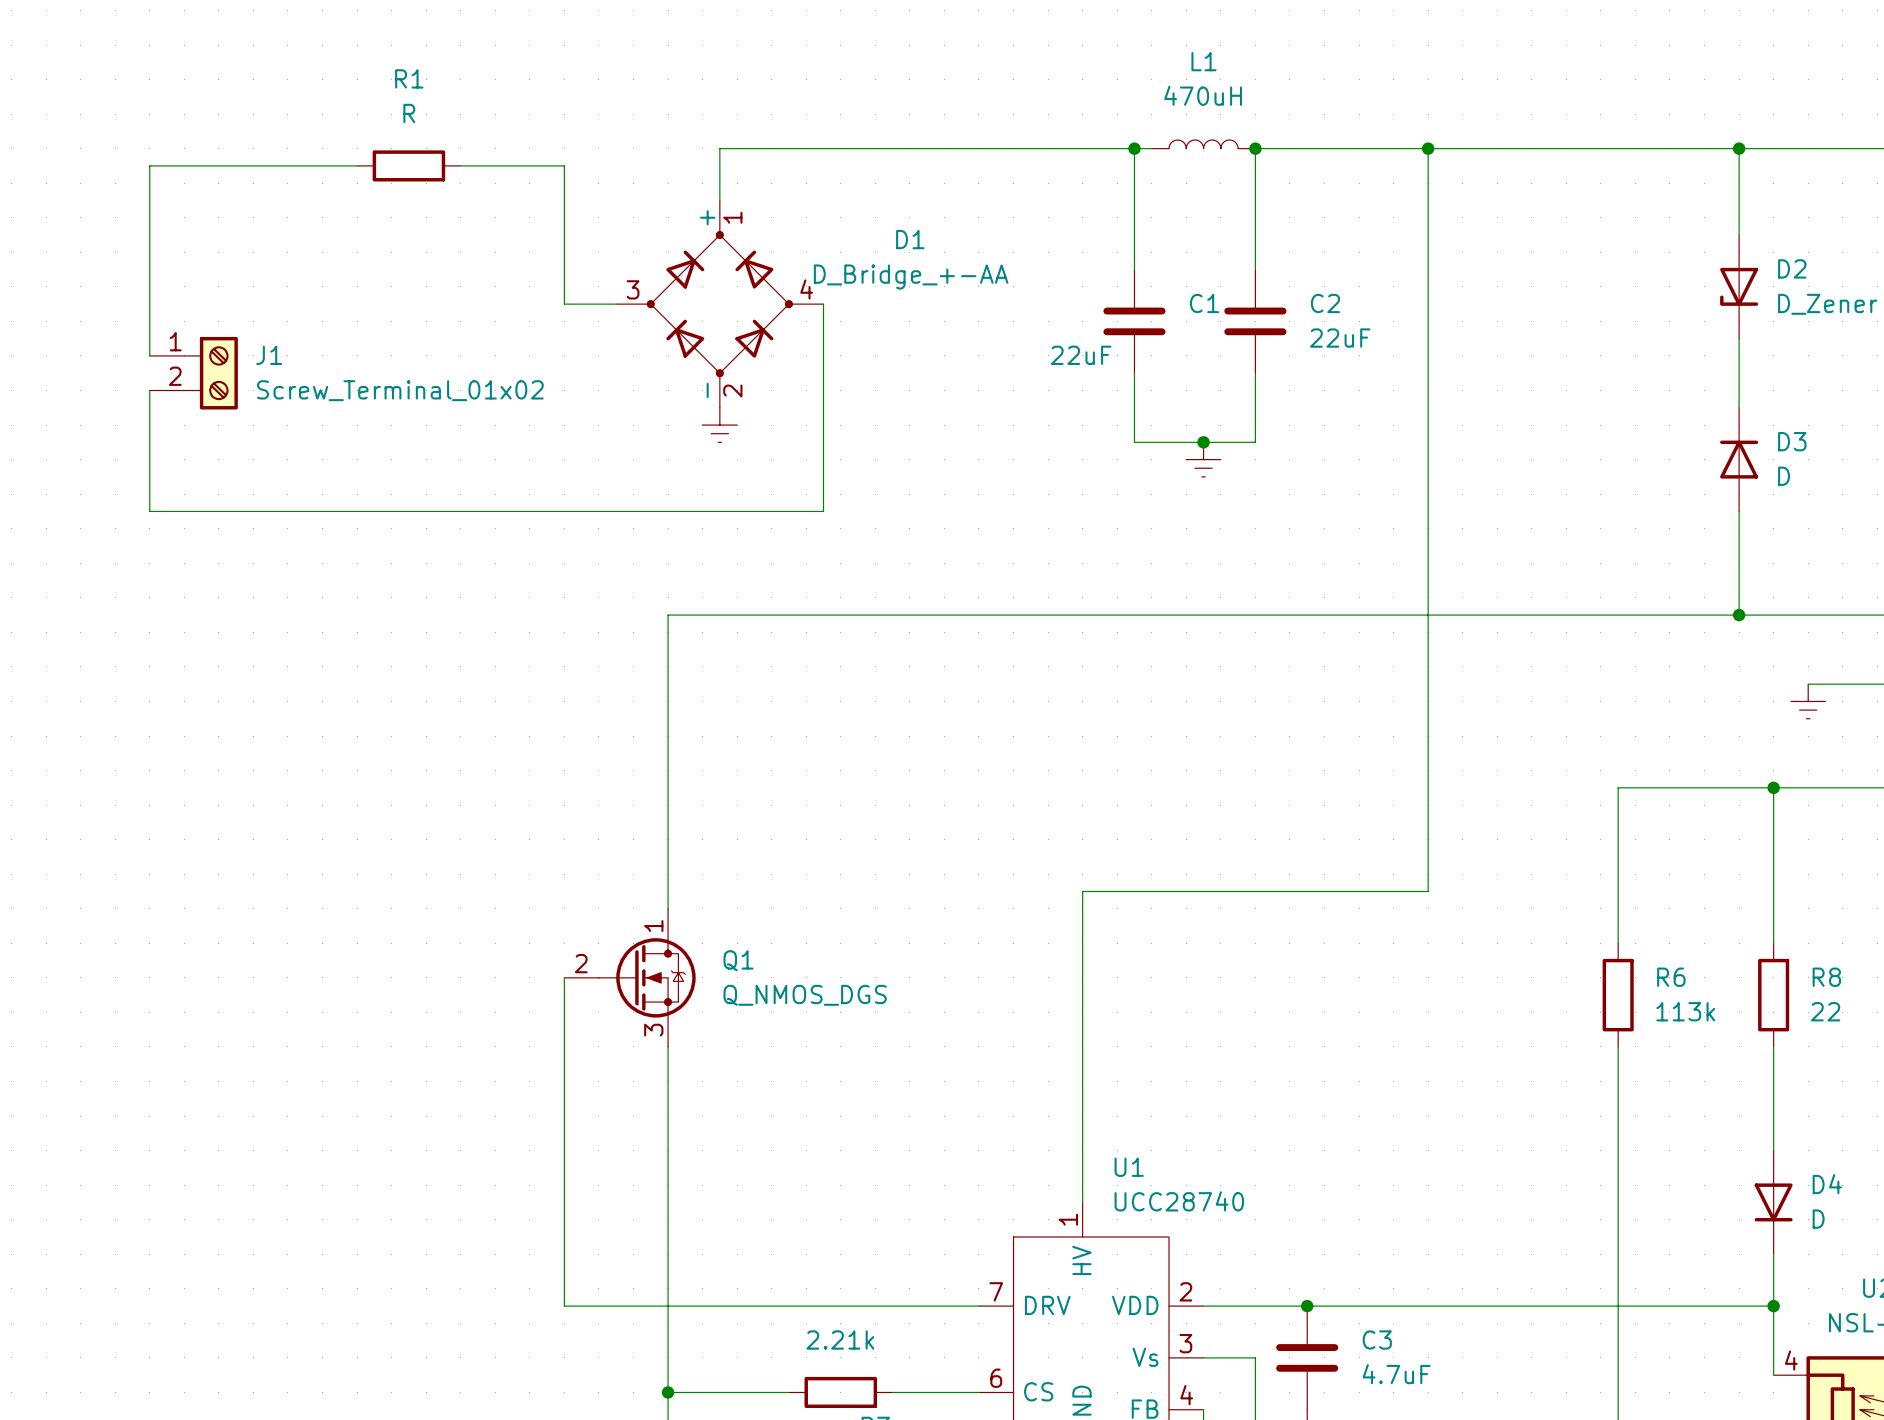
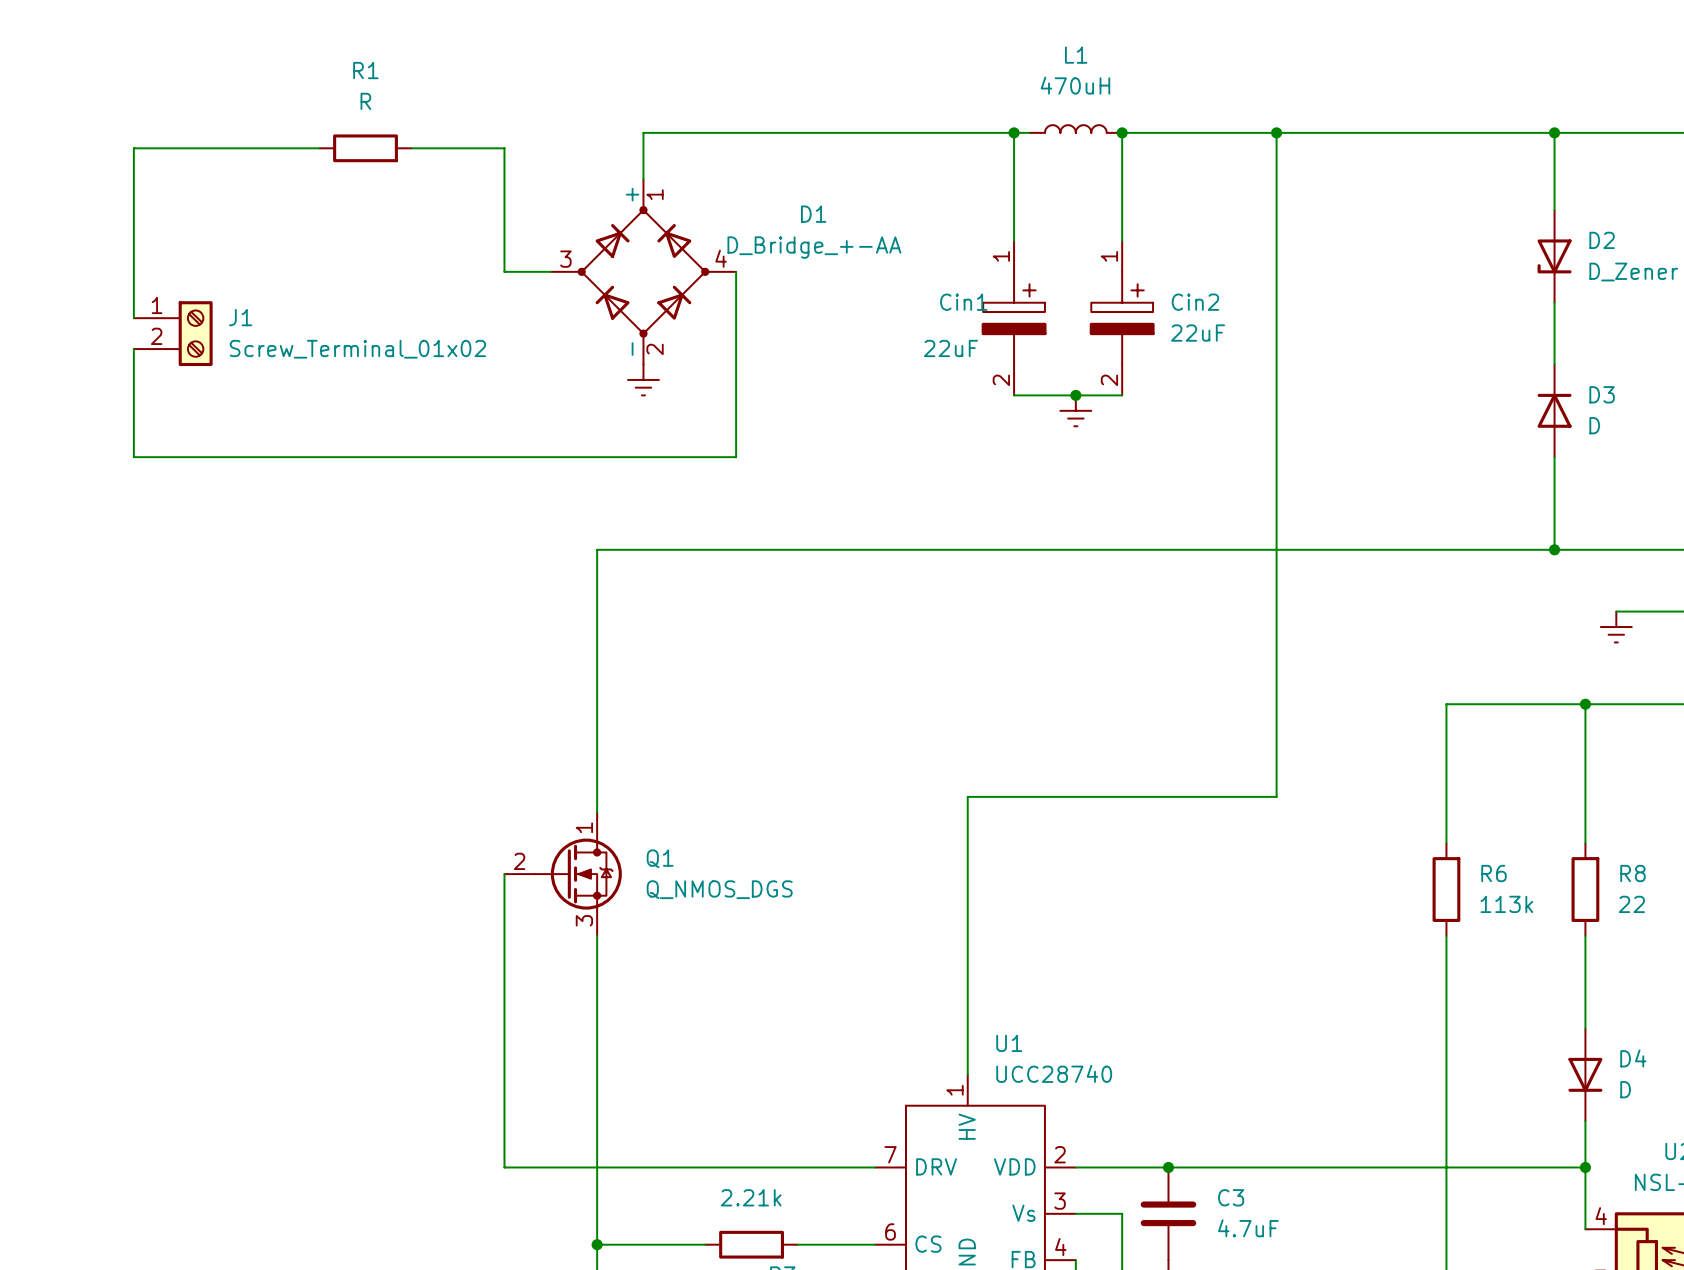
C1: 22uF (1134, 321) -> none
C2: 22uF (1255, 321) -> none
Cin1: none -> 22uF (1014, 318)
Cin2: none -> 22uF (1122, 318)

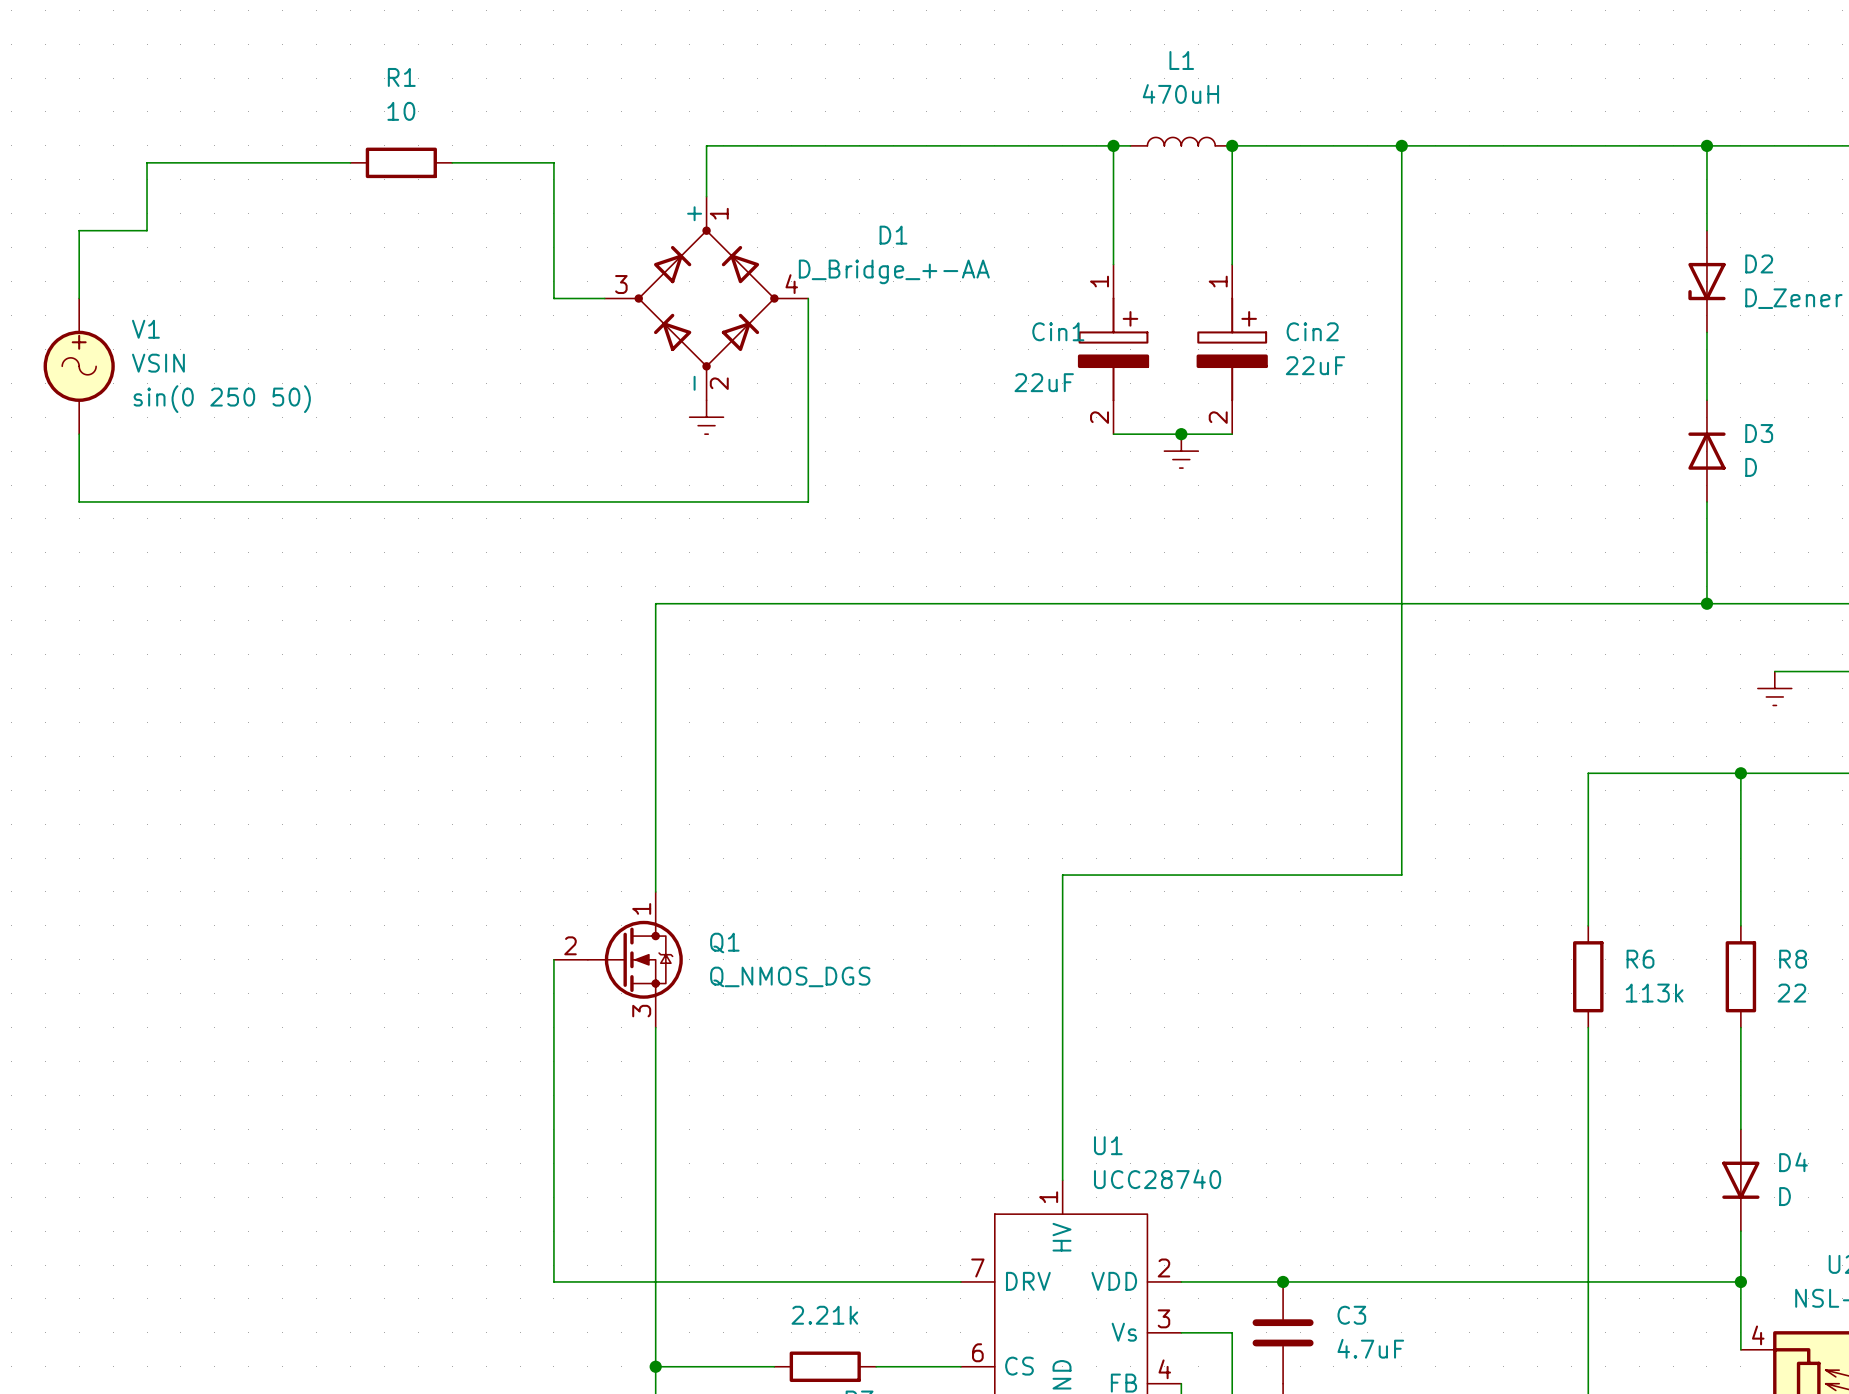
R1 value: R (365, 101) -> 10 (401, 111)
wire: (133, 210) (133, 318) -> (147, 230) (79, 230) (79, 298)
V1: none -> VSIN (79, 366)
J1: Screw_Terminal_01x02 (173, 333) -> none
wire: (133, 349) (133, 457) -> (79, 434) (79, 501) (147, 501)

